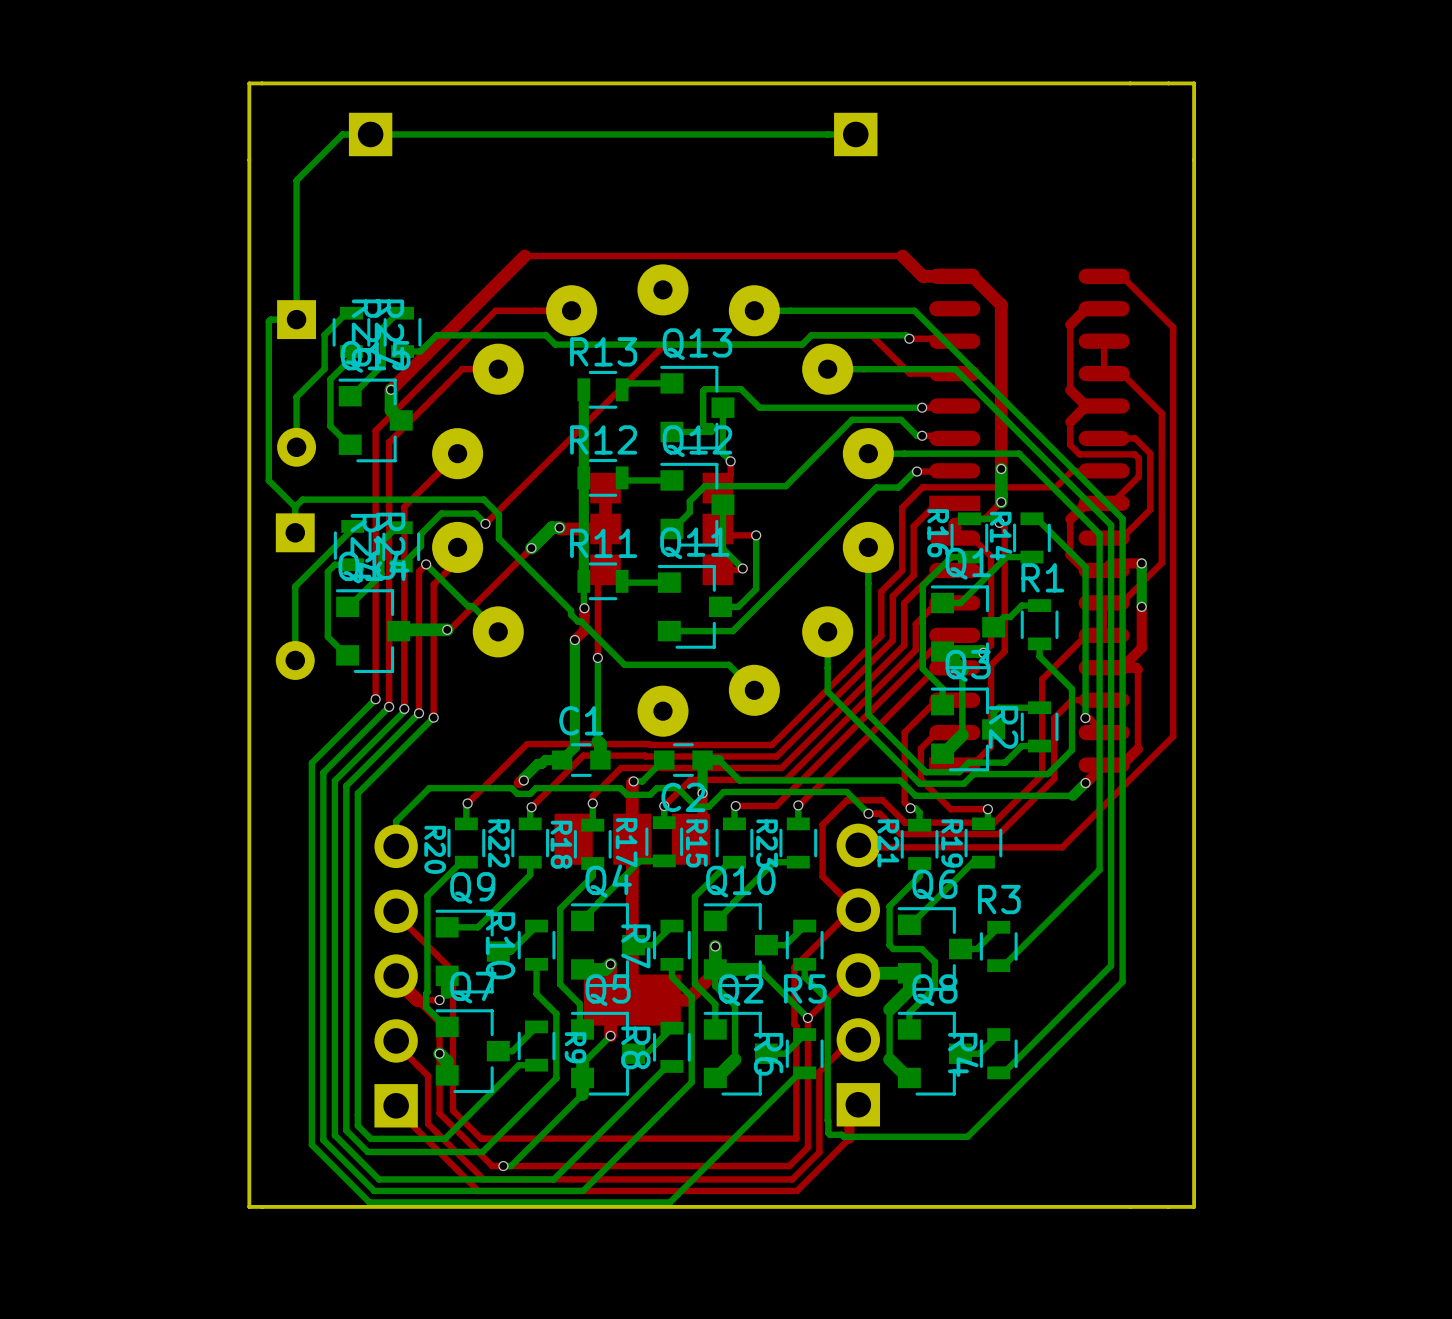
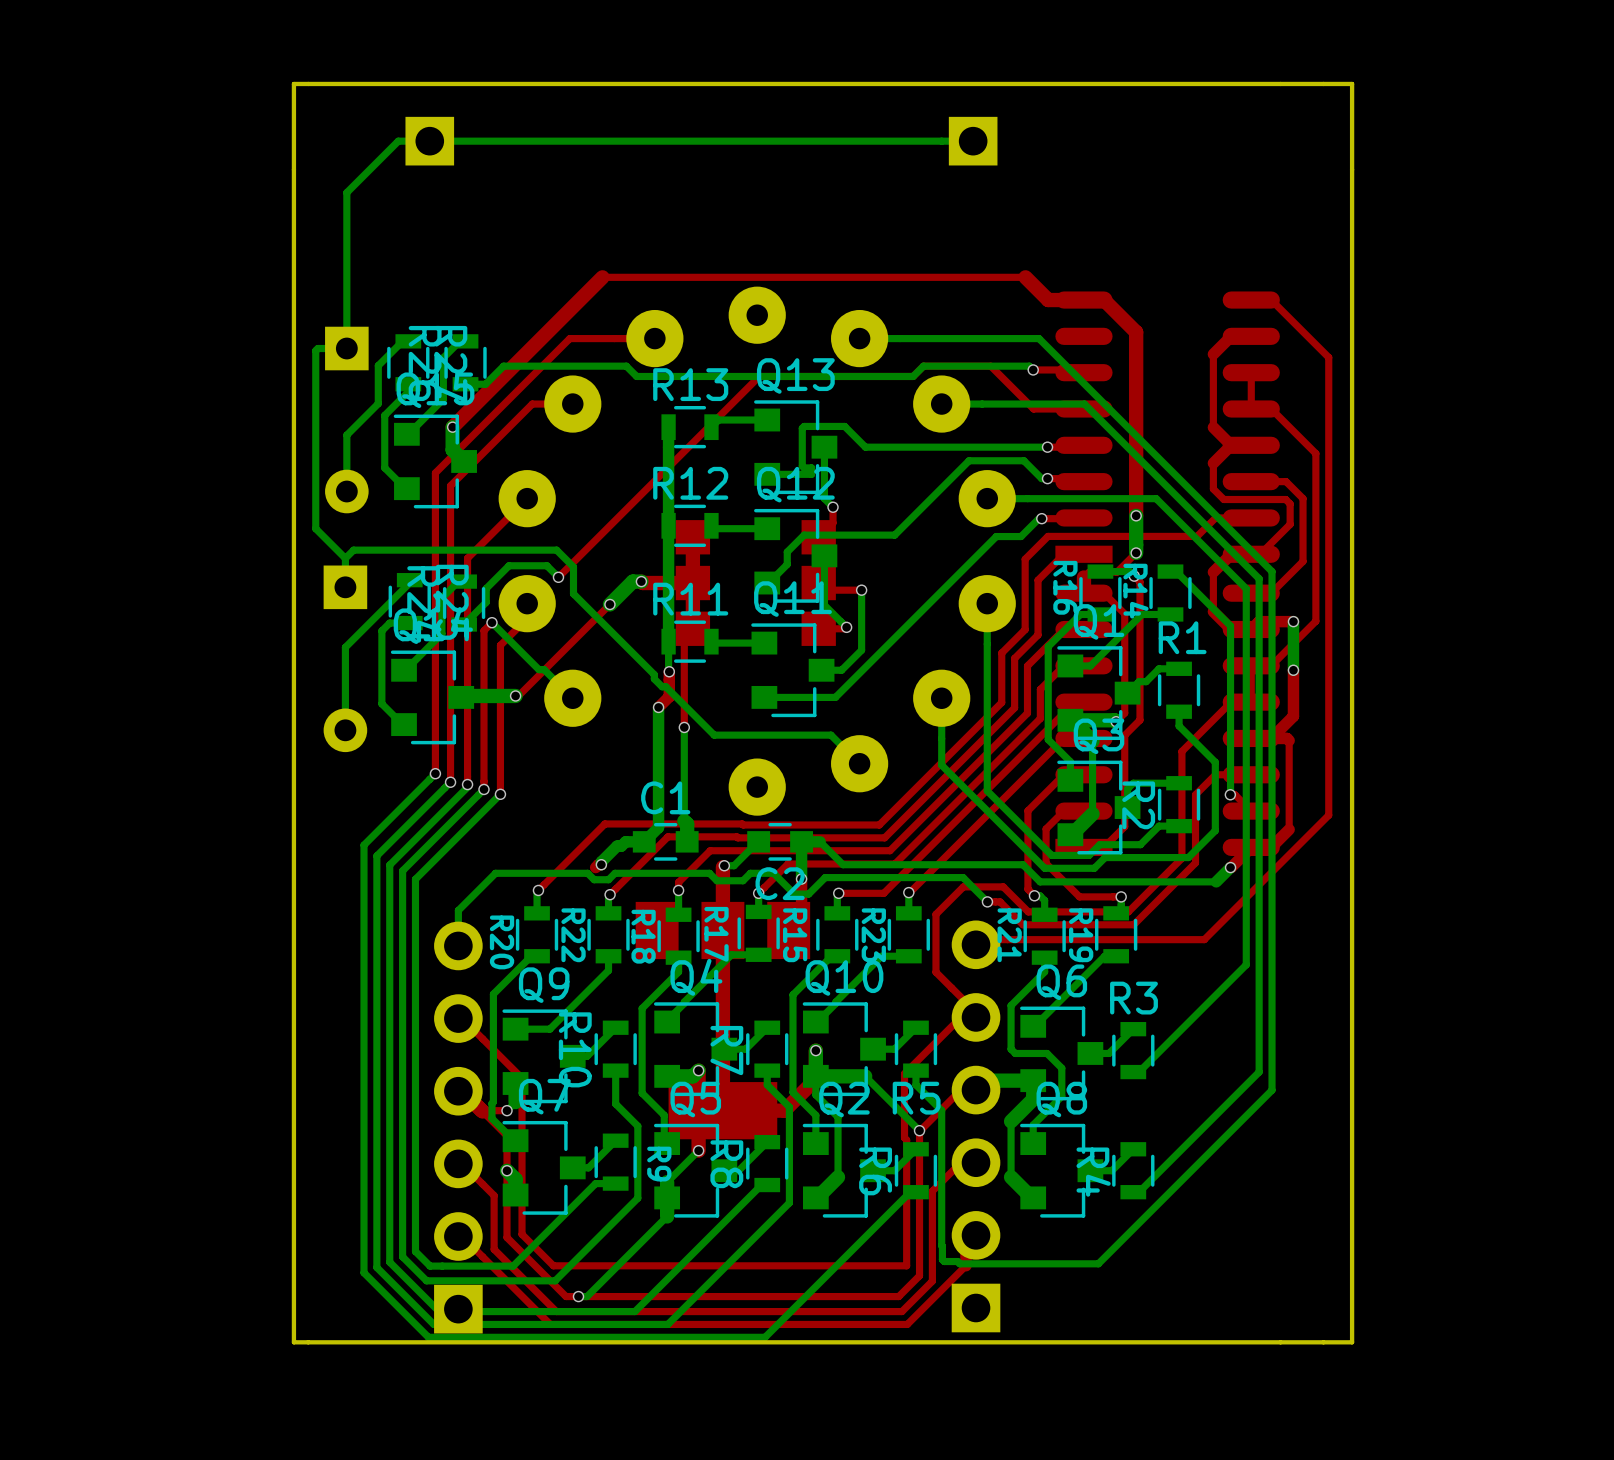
part: (858, 975) -> none
part: (396, 976) -> none
part: none -> (976, 1126)
part: none -> (458, 1127)

